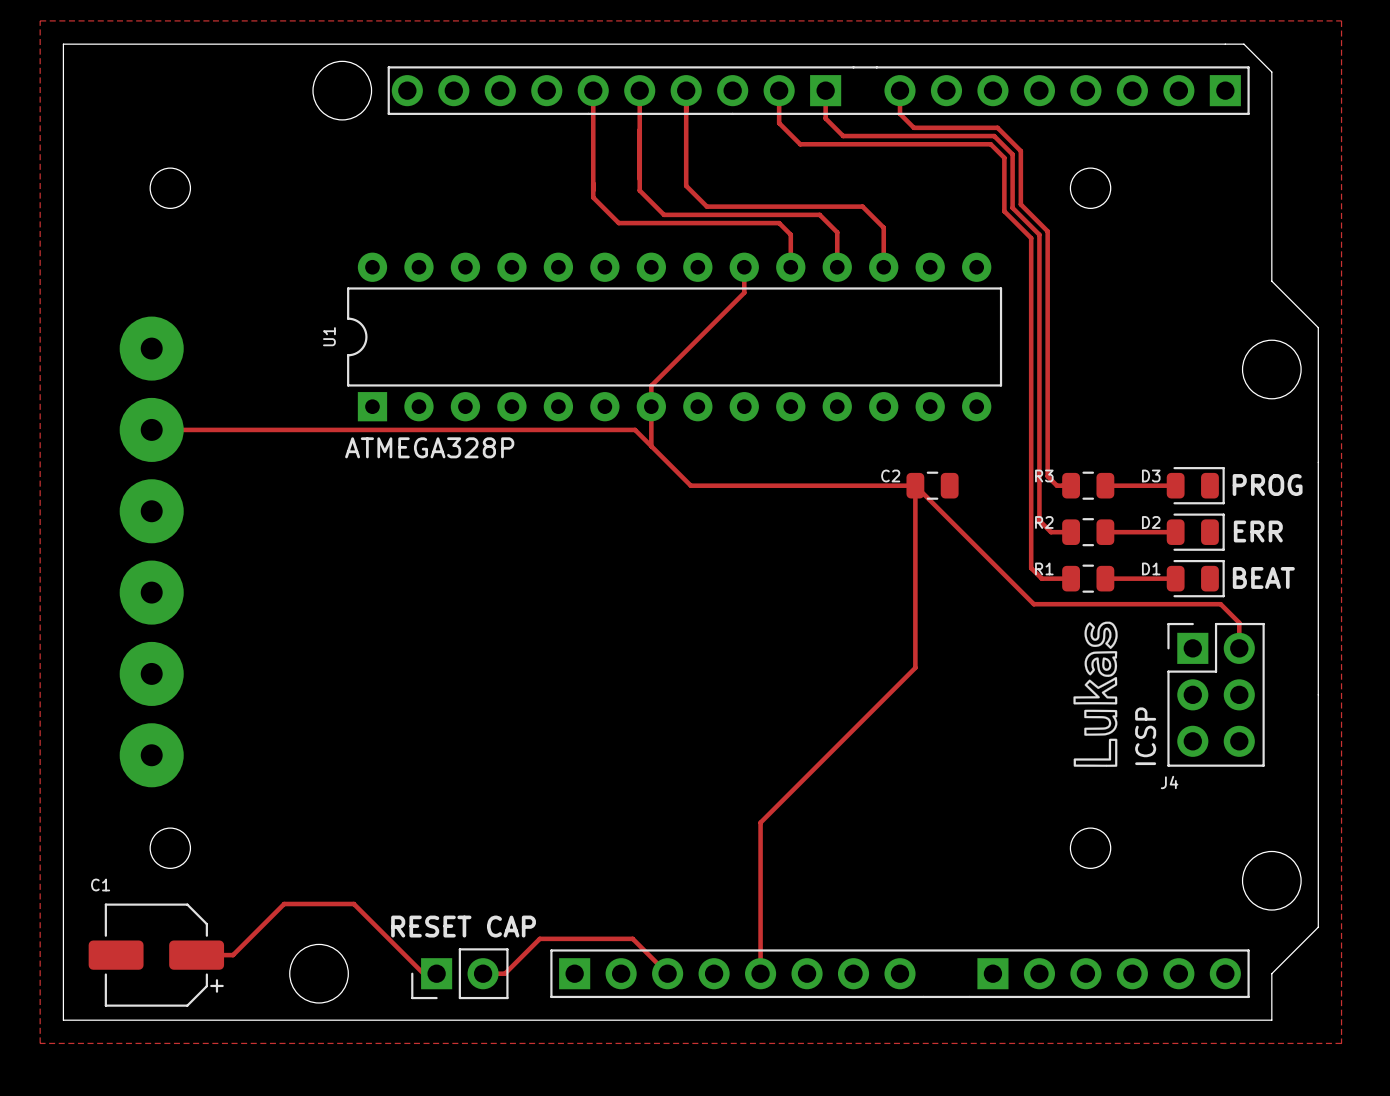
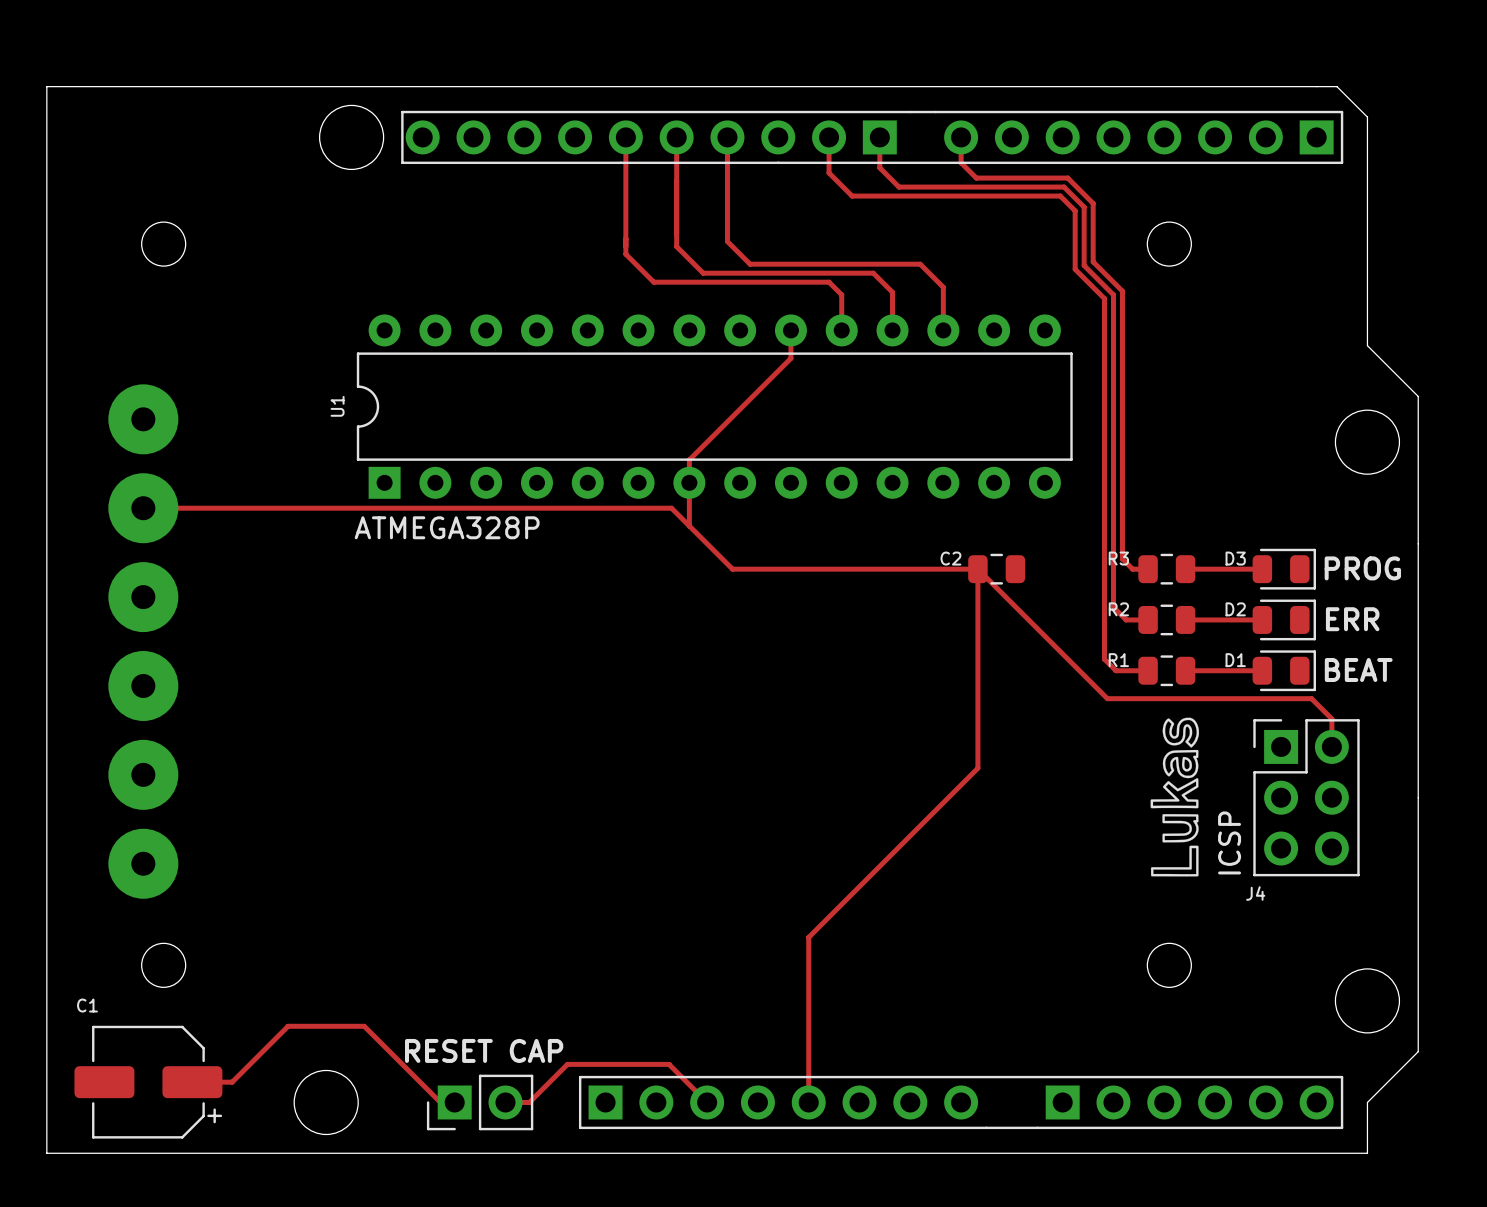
zone outline: (40, 20) (40, 1043) (1341, 1043) (1341, 20) (40, 20) -> none

